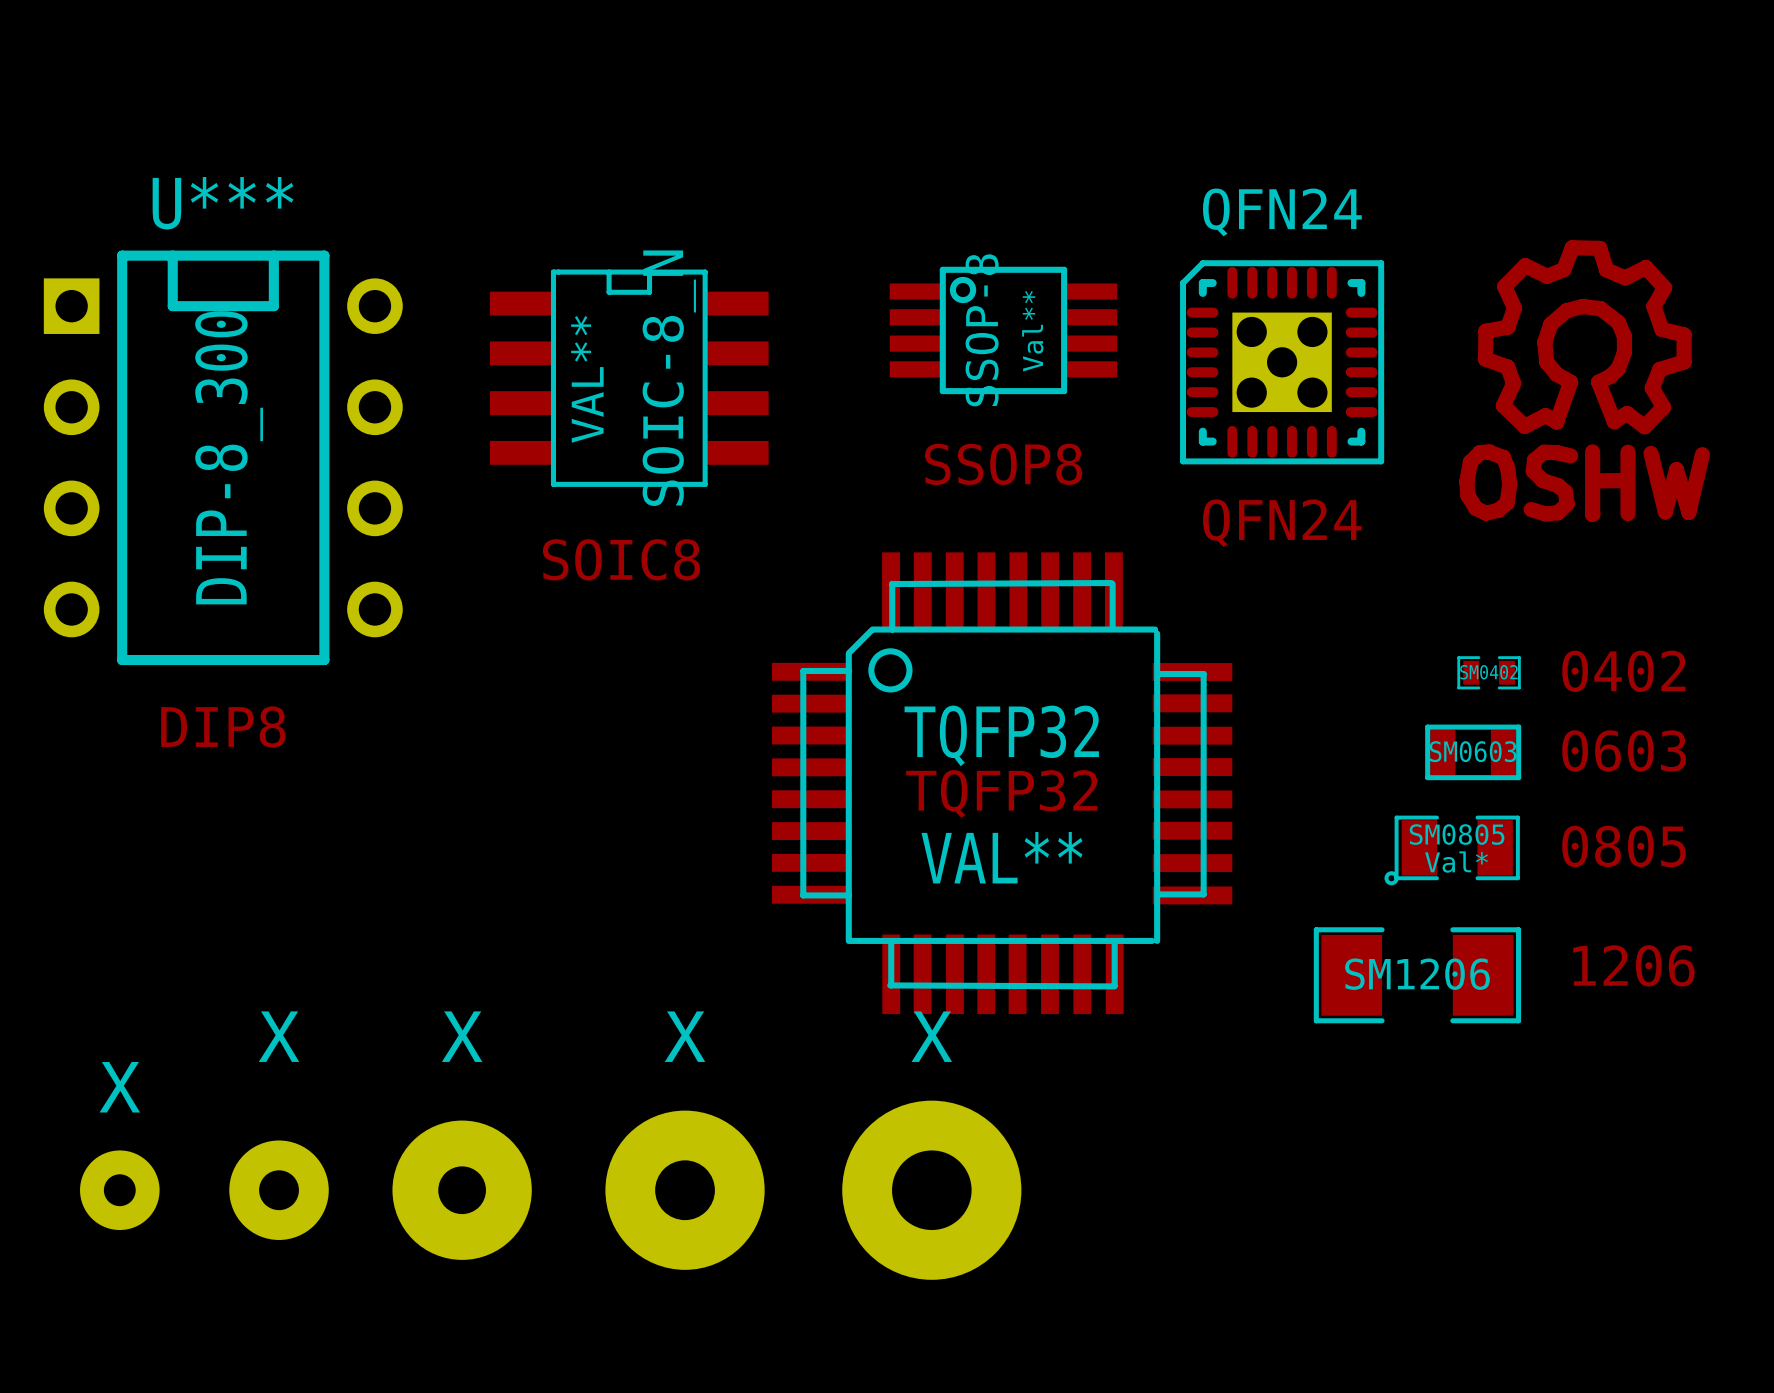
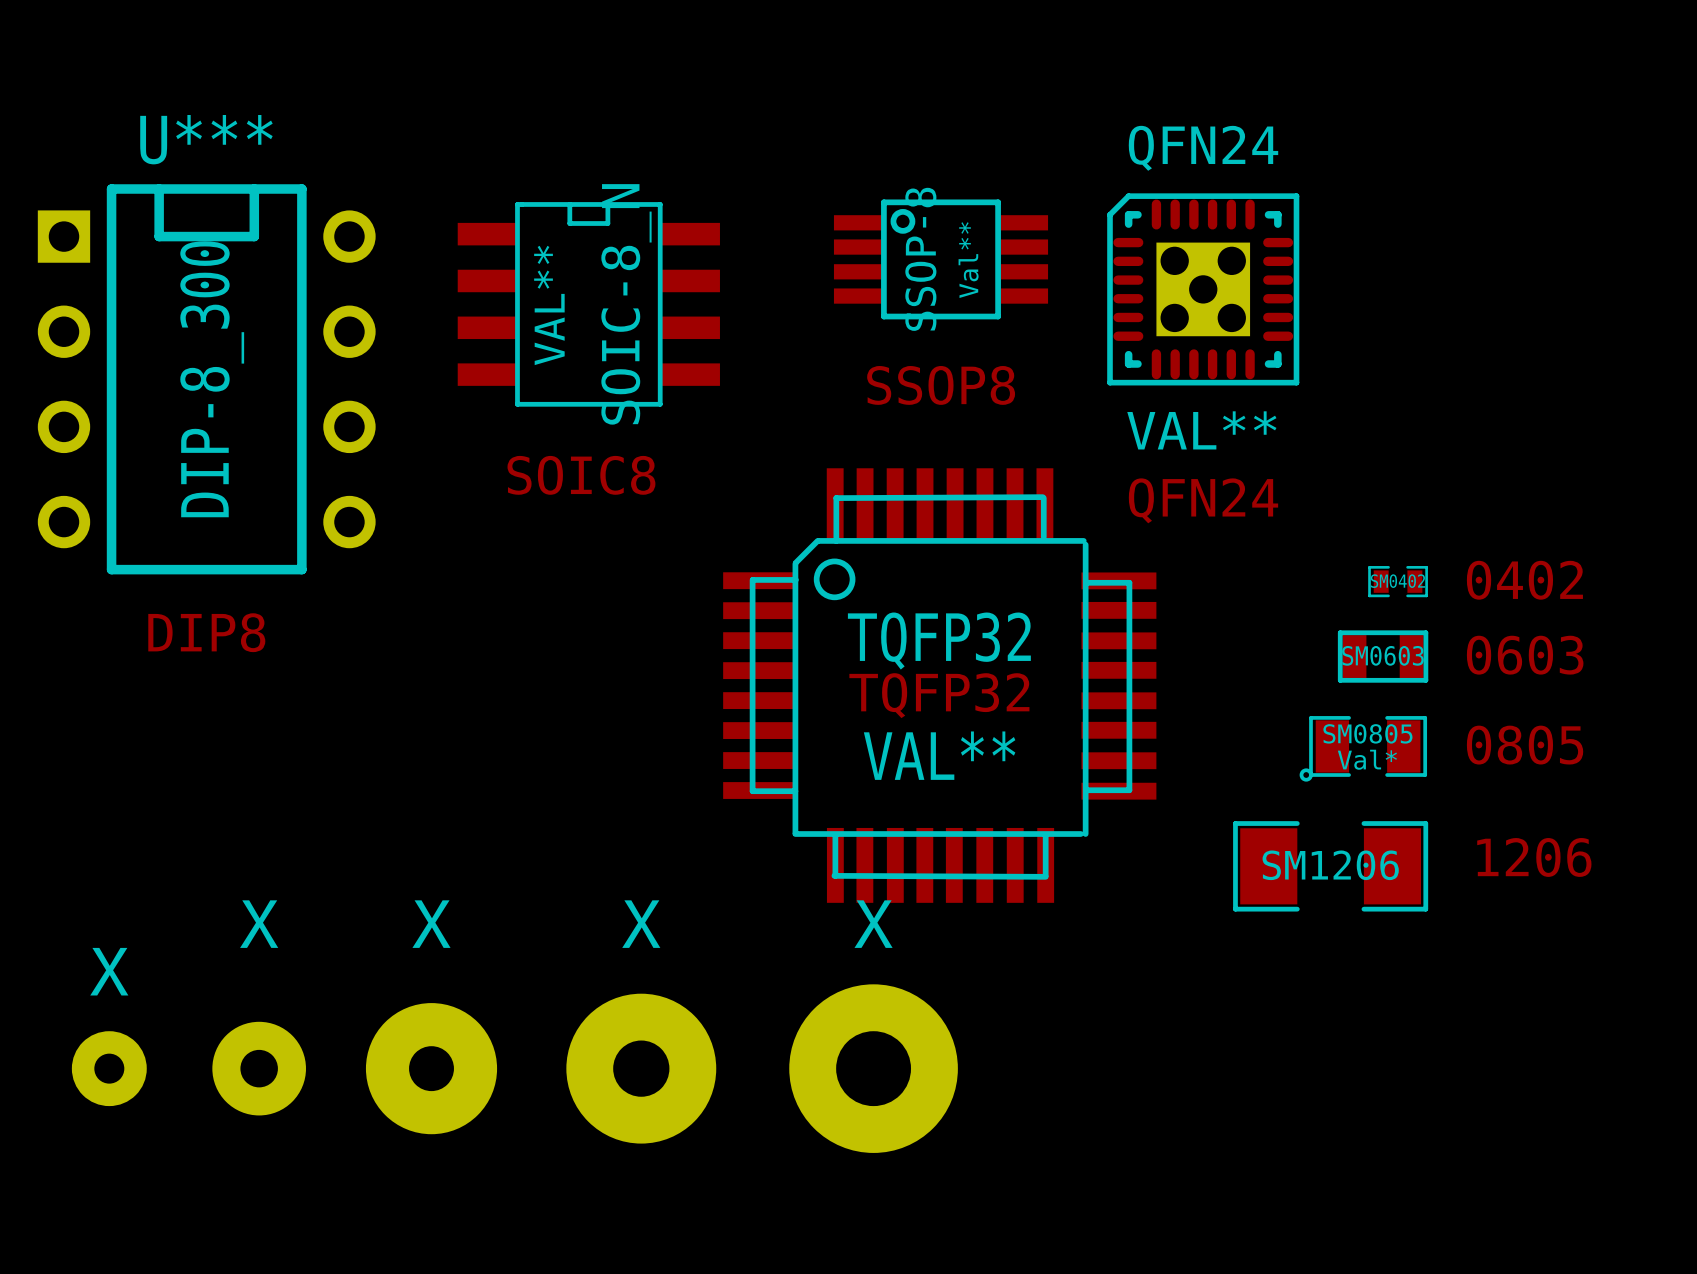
drawing: [1459, 240, 1710, 522] -> none
QFN24 value: none -> VAL** (1201, 430)
text position: QFN24 (1282, 523) -> QFN24 (1203, 500)

